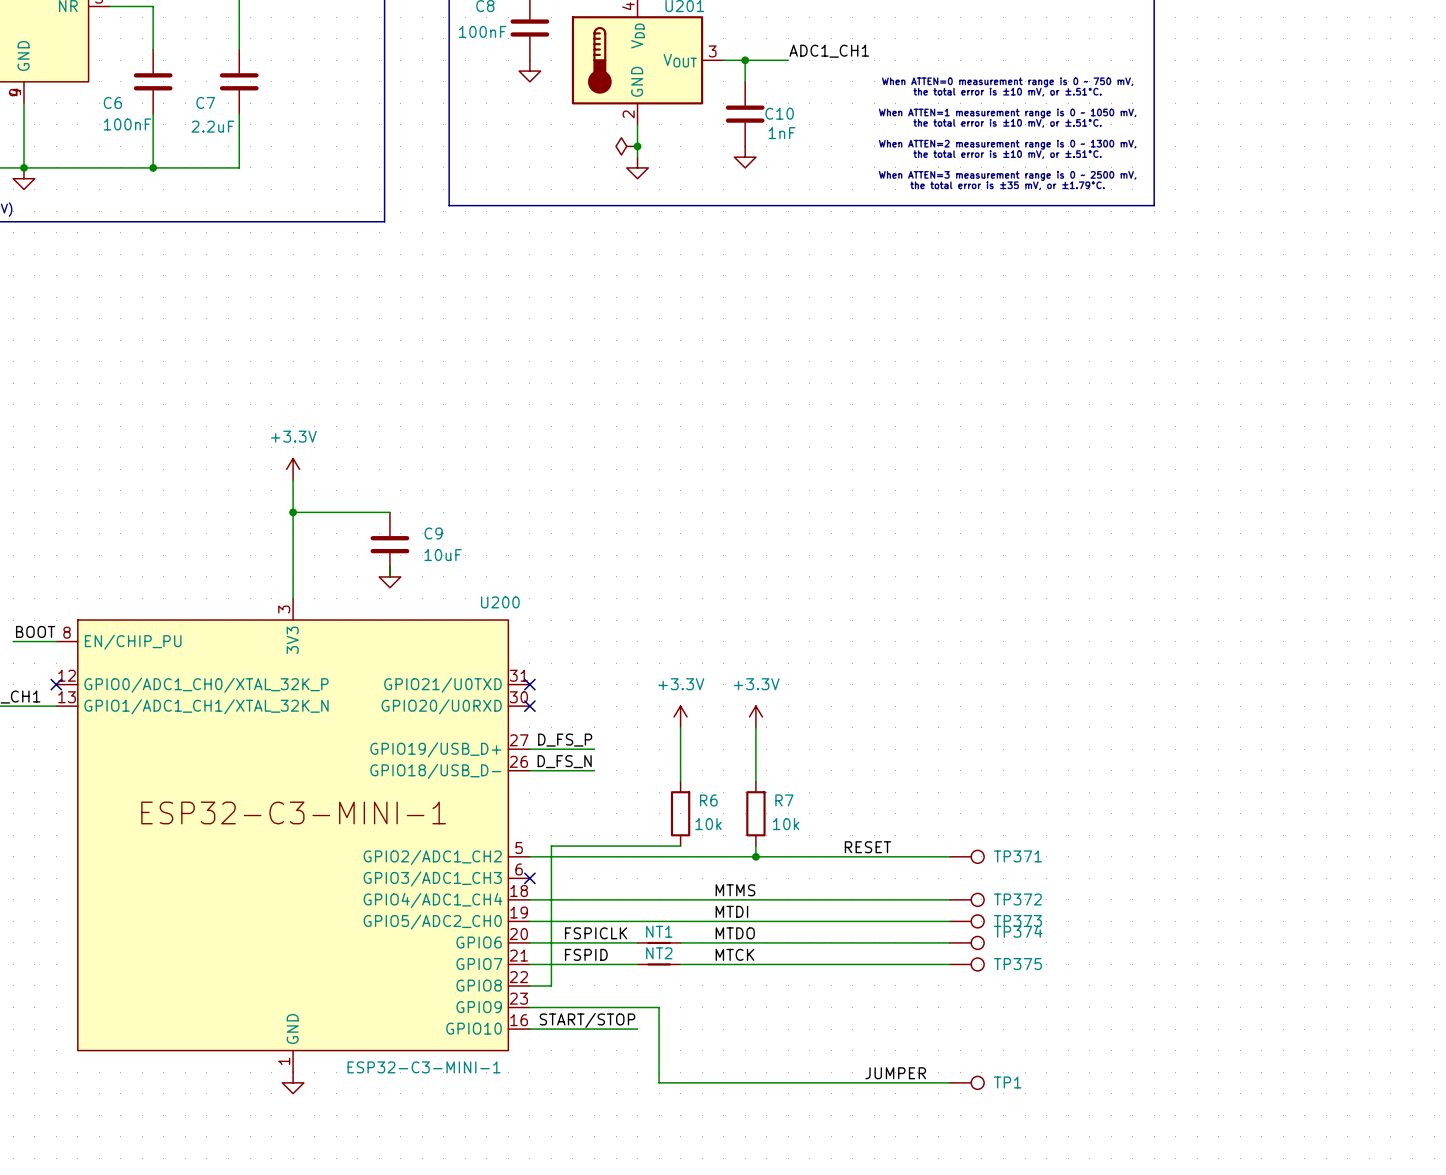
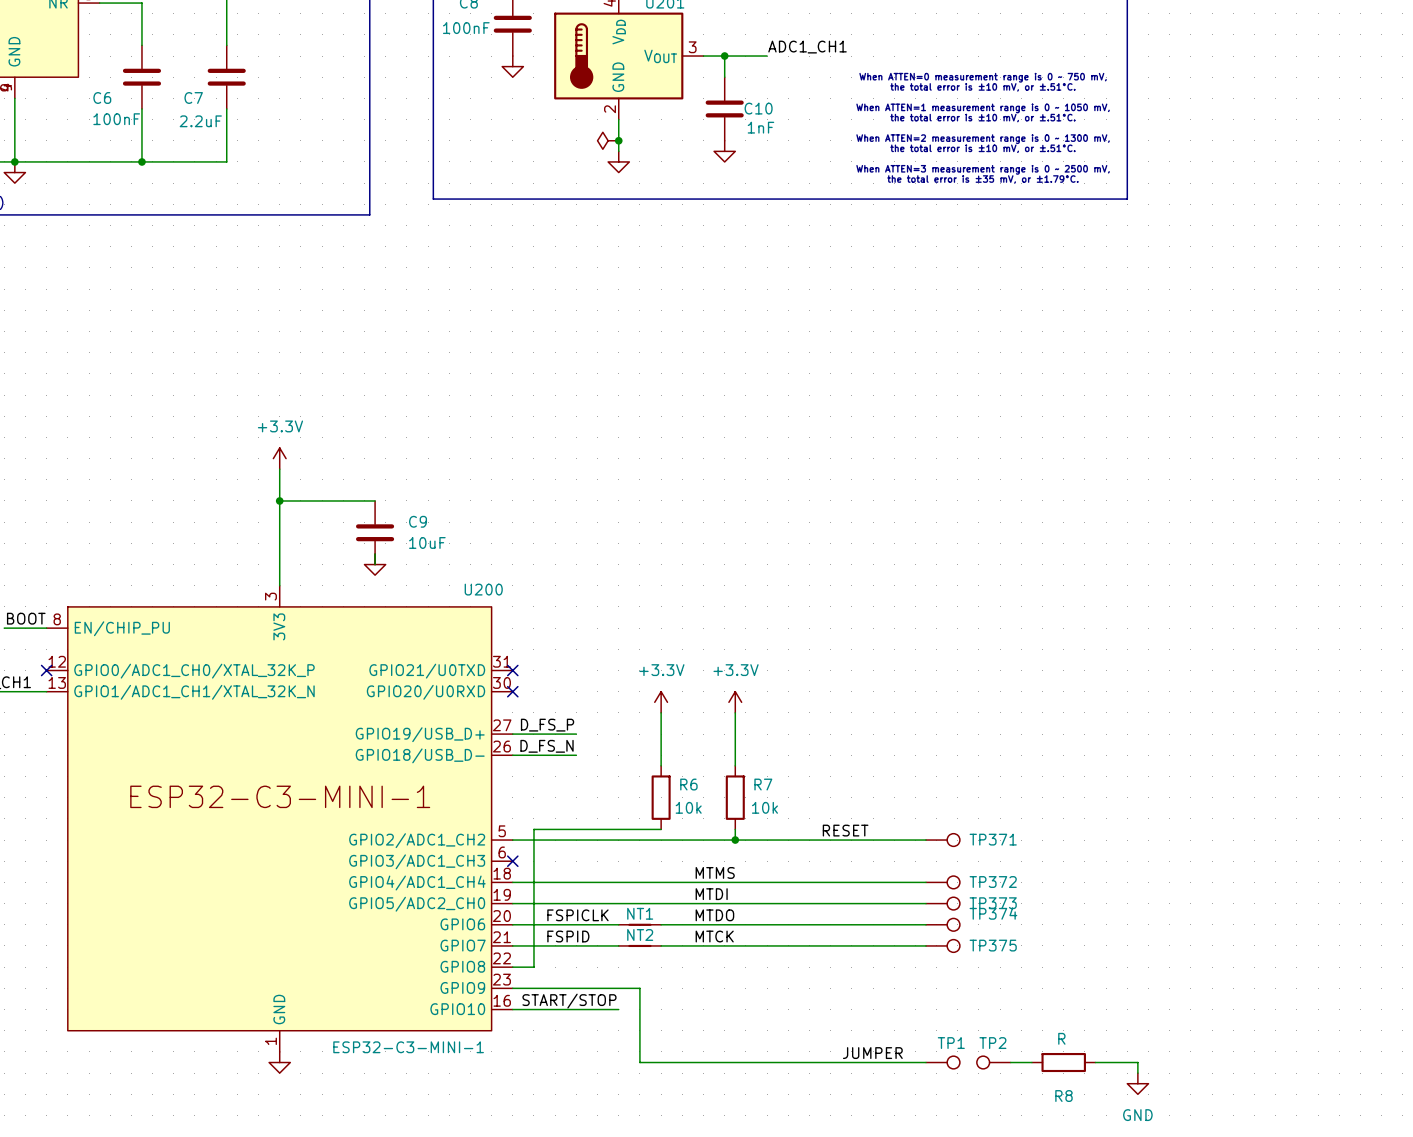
TP1 name position: TP1 (1007, 1082) -> TP1 (951, 1043)
TP2: none -> (993, 1062)
wire: none -> (1010, 1062) (1031, 1062)
R8: none -> R (1063, 1062)
wire: none -> (1095, 1062) (1137, 1062) (1137, 1073)
power symbol: none -> GND (1137, 1083)

